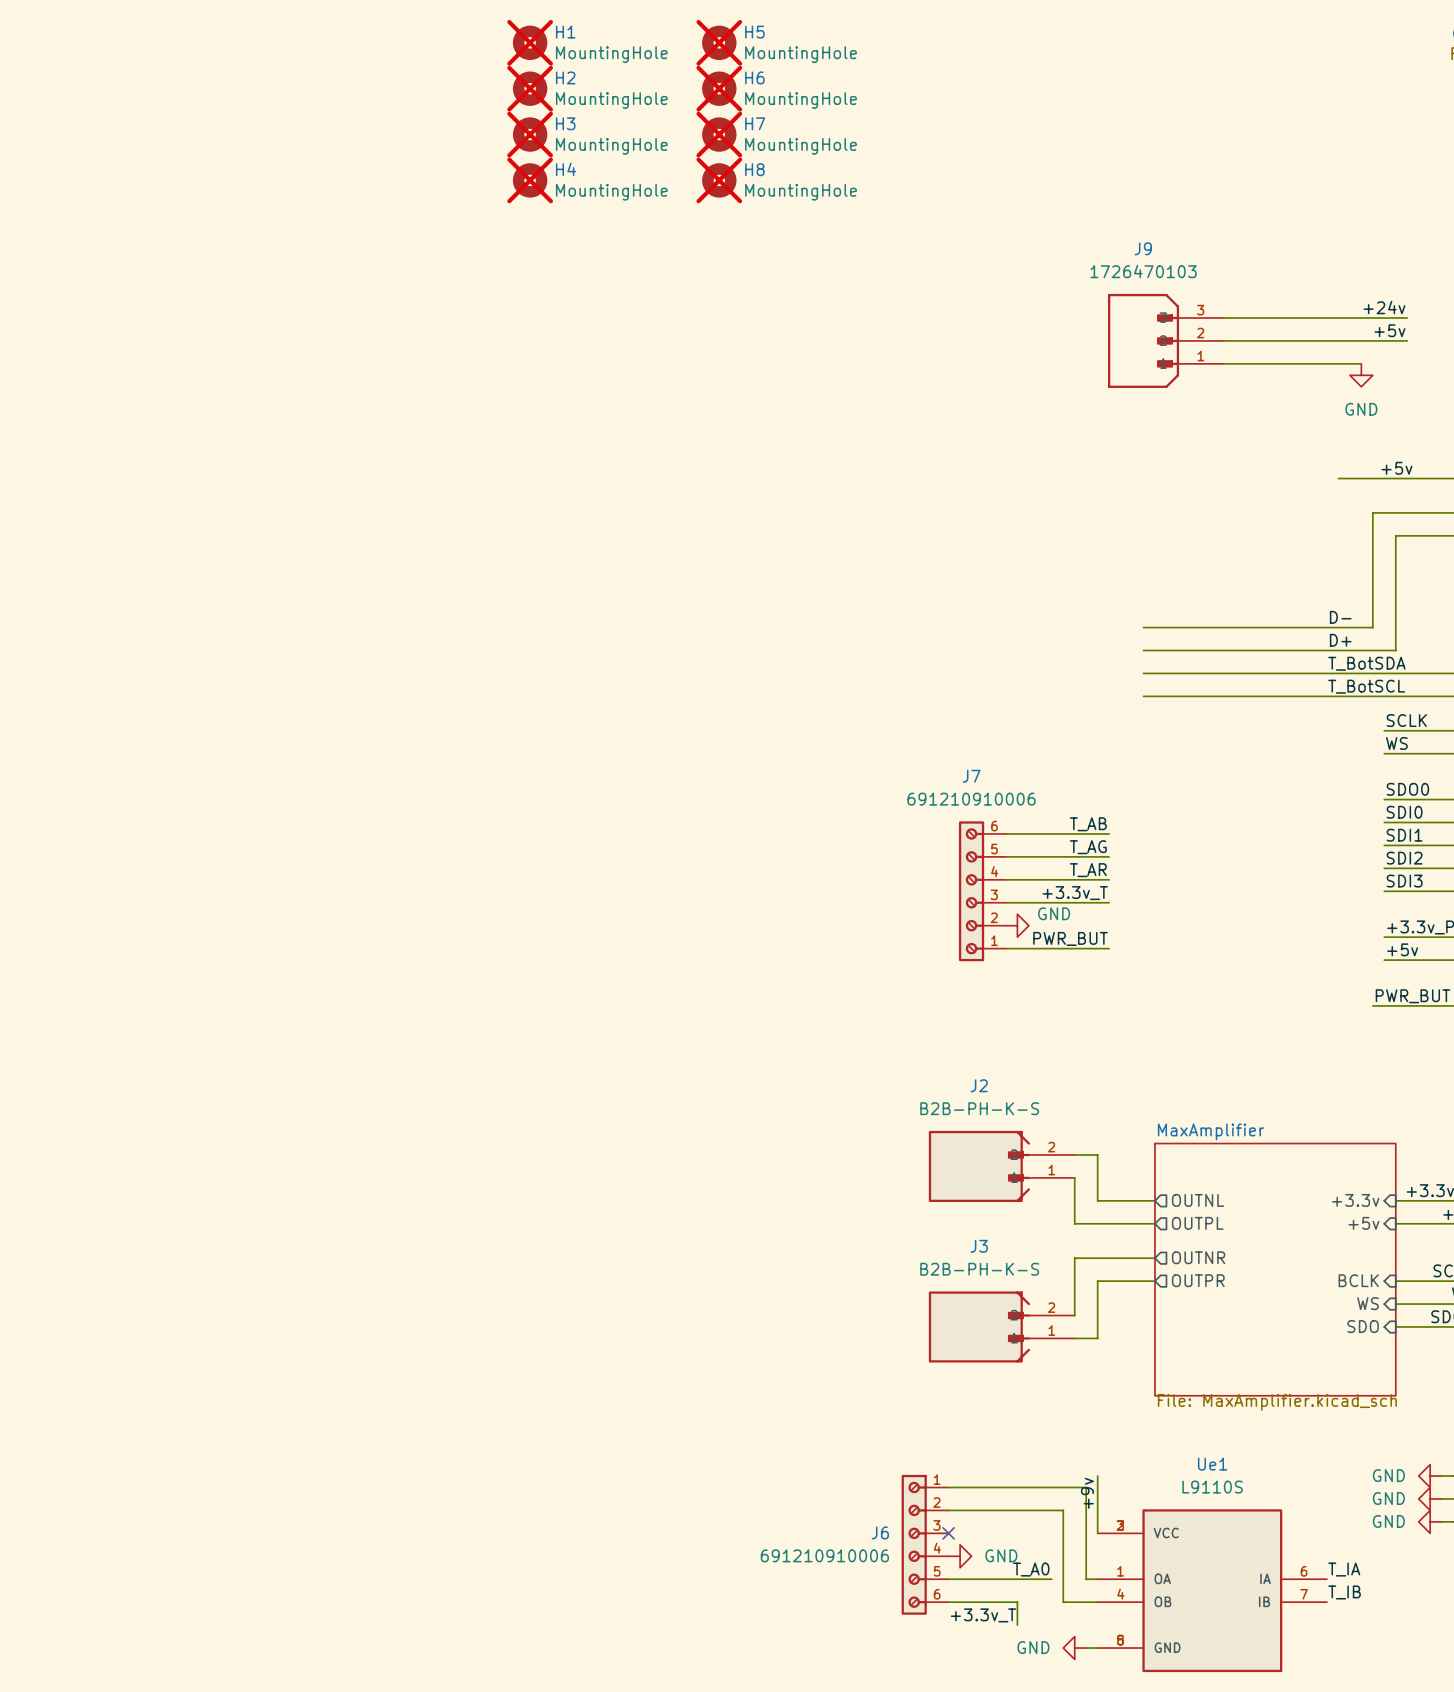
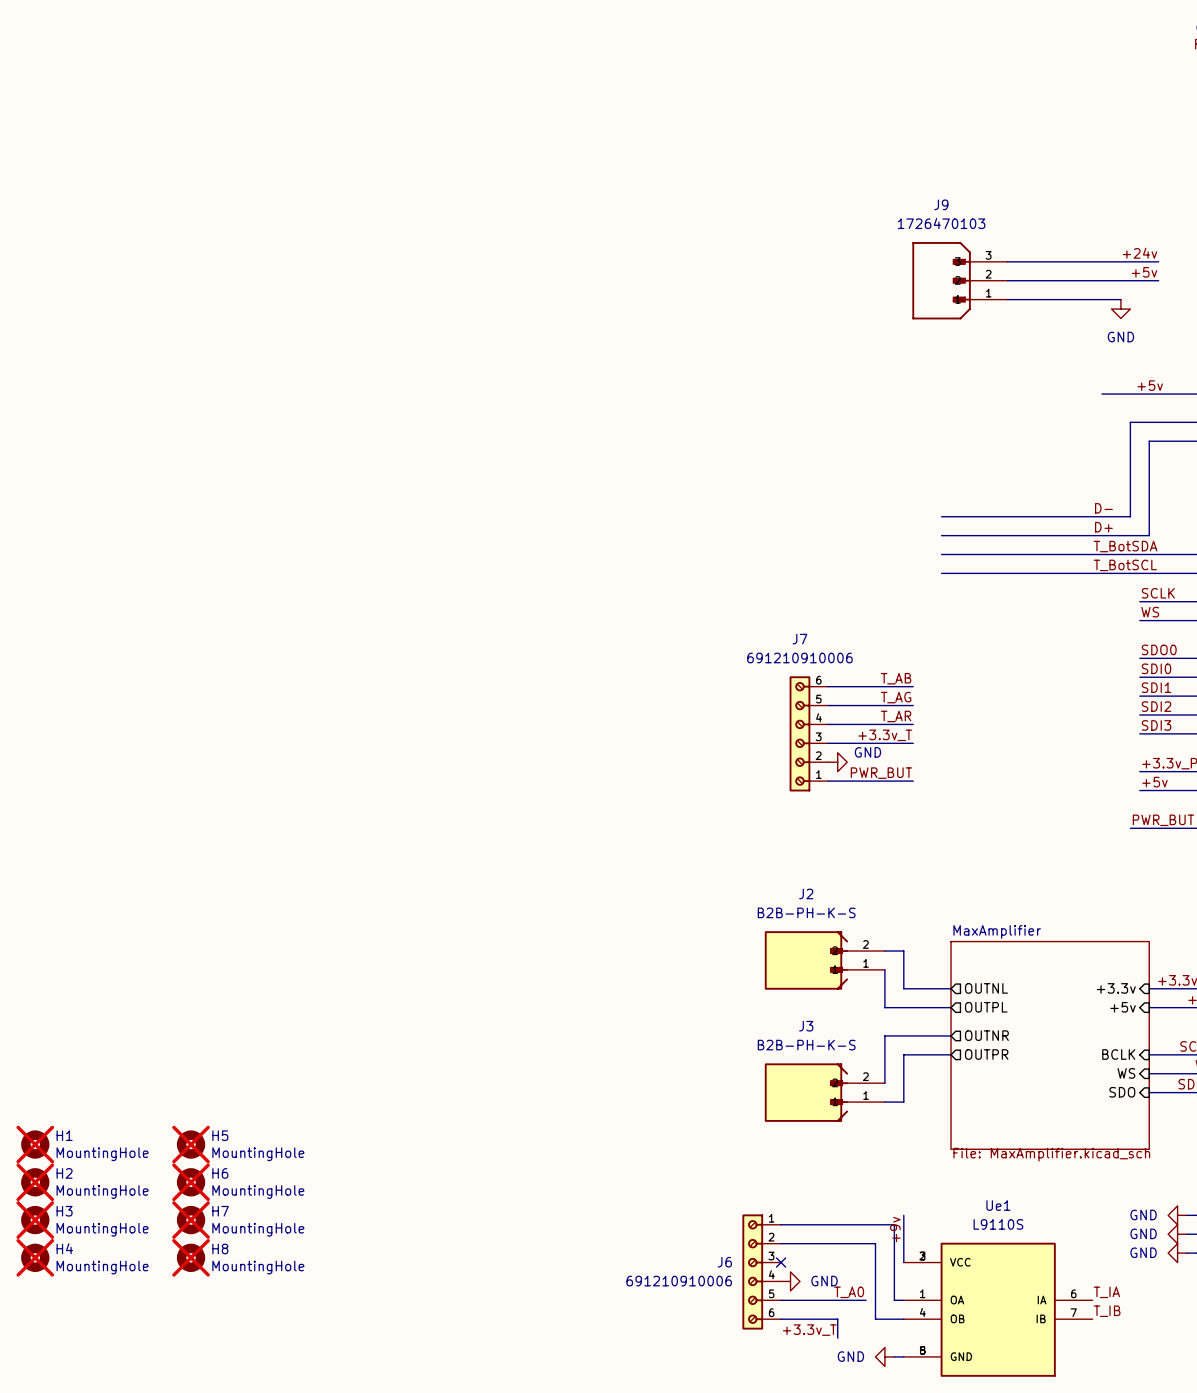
H1 position: (530, 42) -> (35, 1144)
H5 position: (719, 42) -> (191, 1144)
H2 position: (530, 88) -> (35, 1182)
H6 position: (719, 88) -> (191, 1182)
H3 position: (530, 134) -> (35, 1220)
H7 position: (719, 134) -> (191, 1220)
H4 position: (530, 180) -> (35, 1257)
H8 position: (719, 180) -> (191, 1257)

